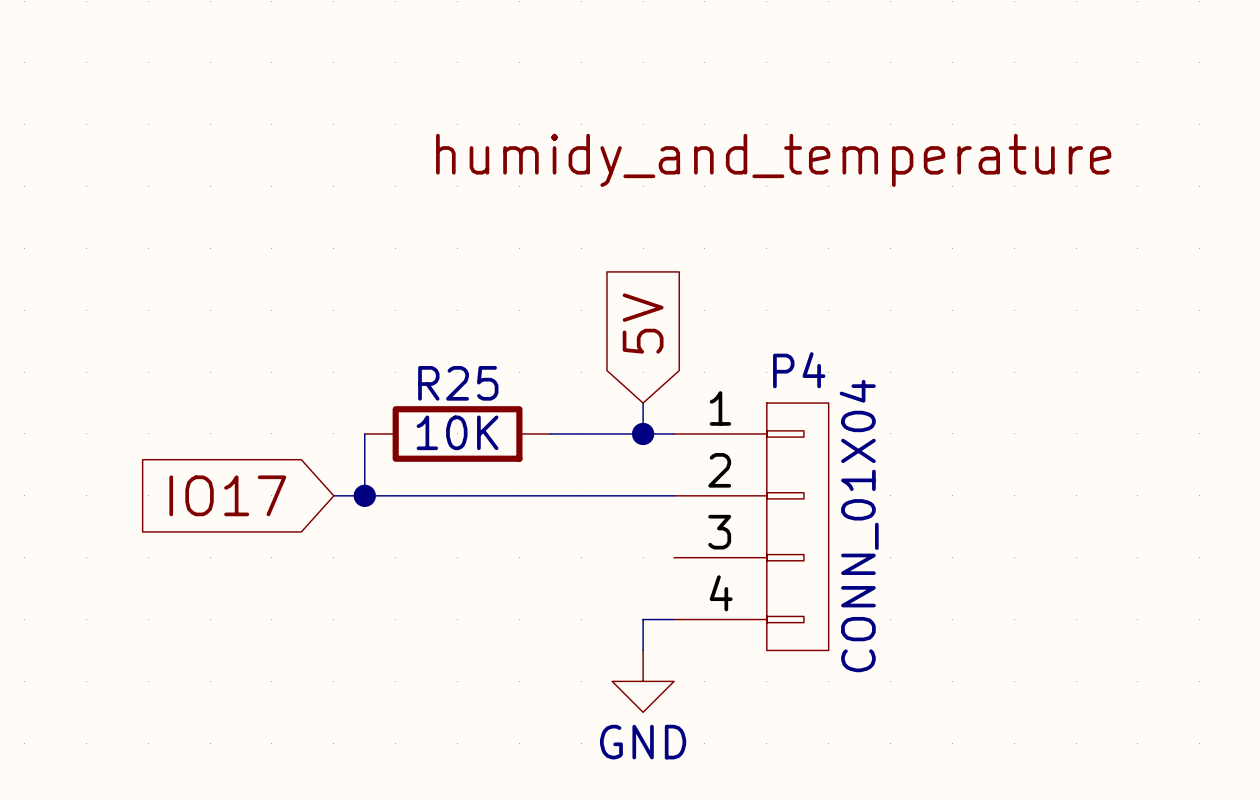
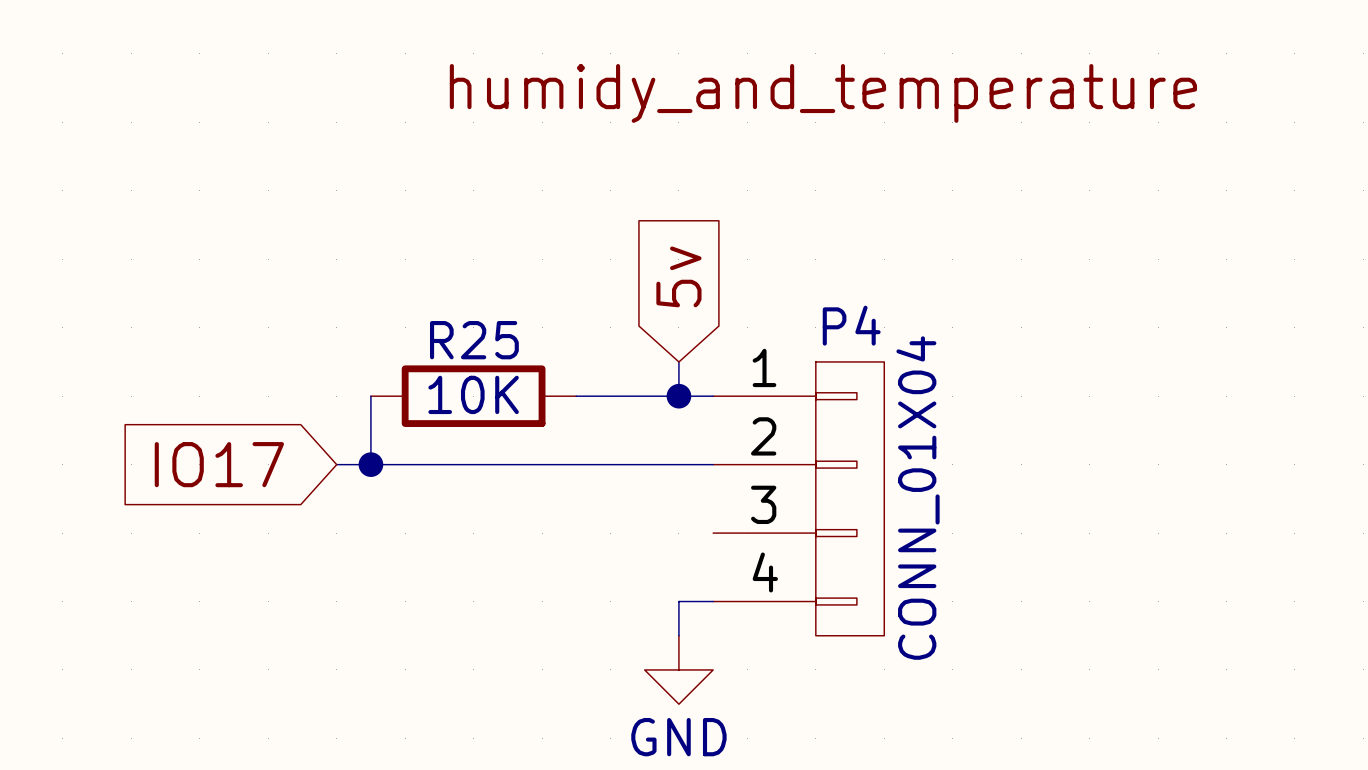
global label: 5V (643, 323) -> 5v (678, 276)

